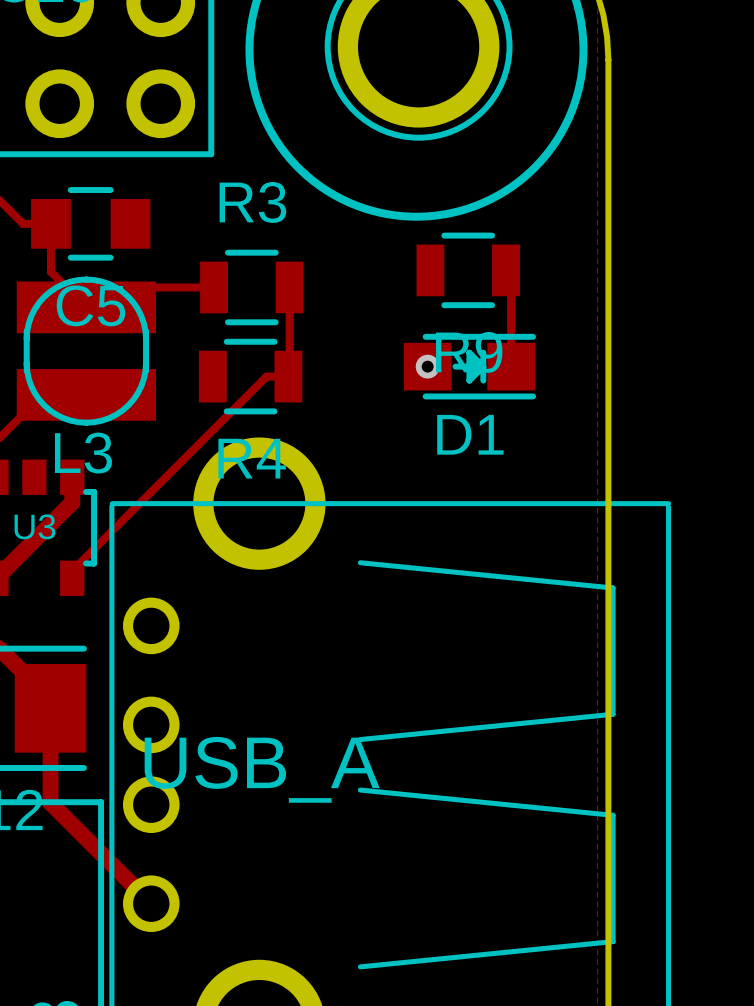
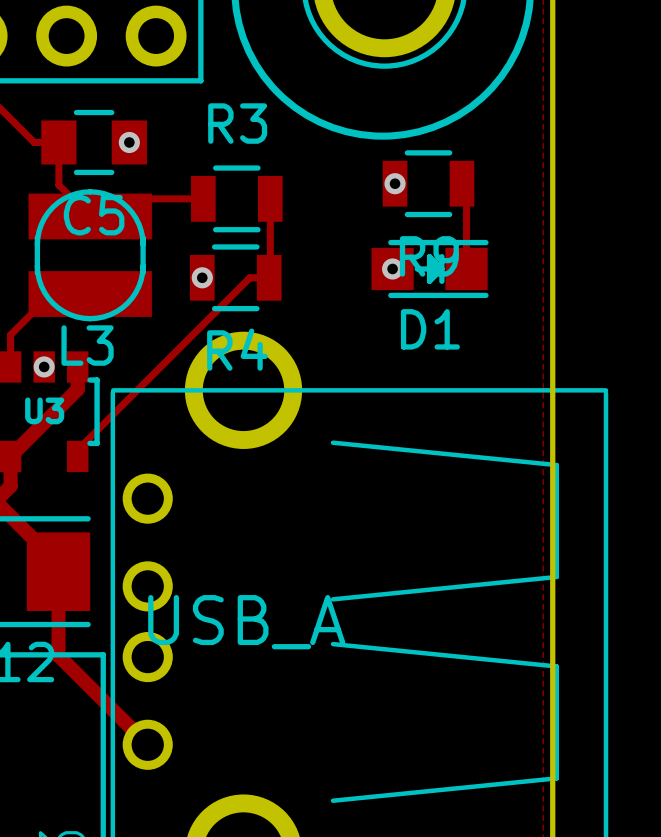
via: none -> (129, 142)
via: none -> (395, 183)
via: none -> (202, 277)
via: none -> (44, 366)

